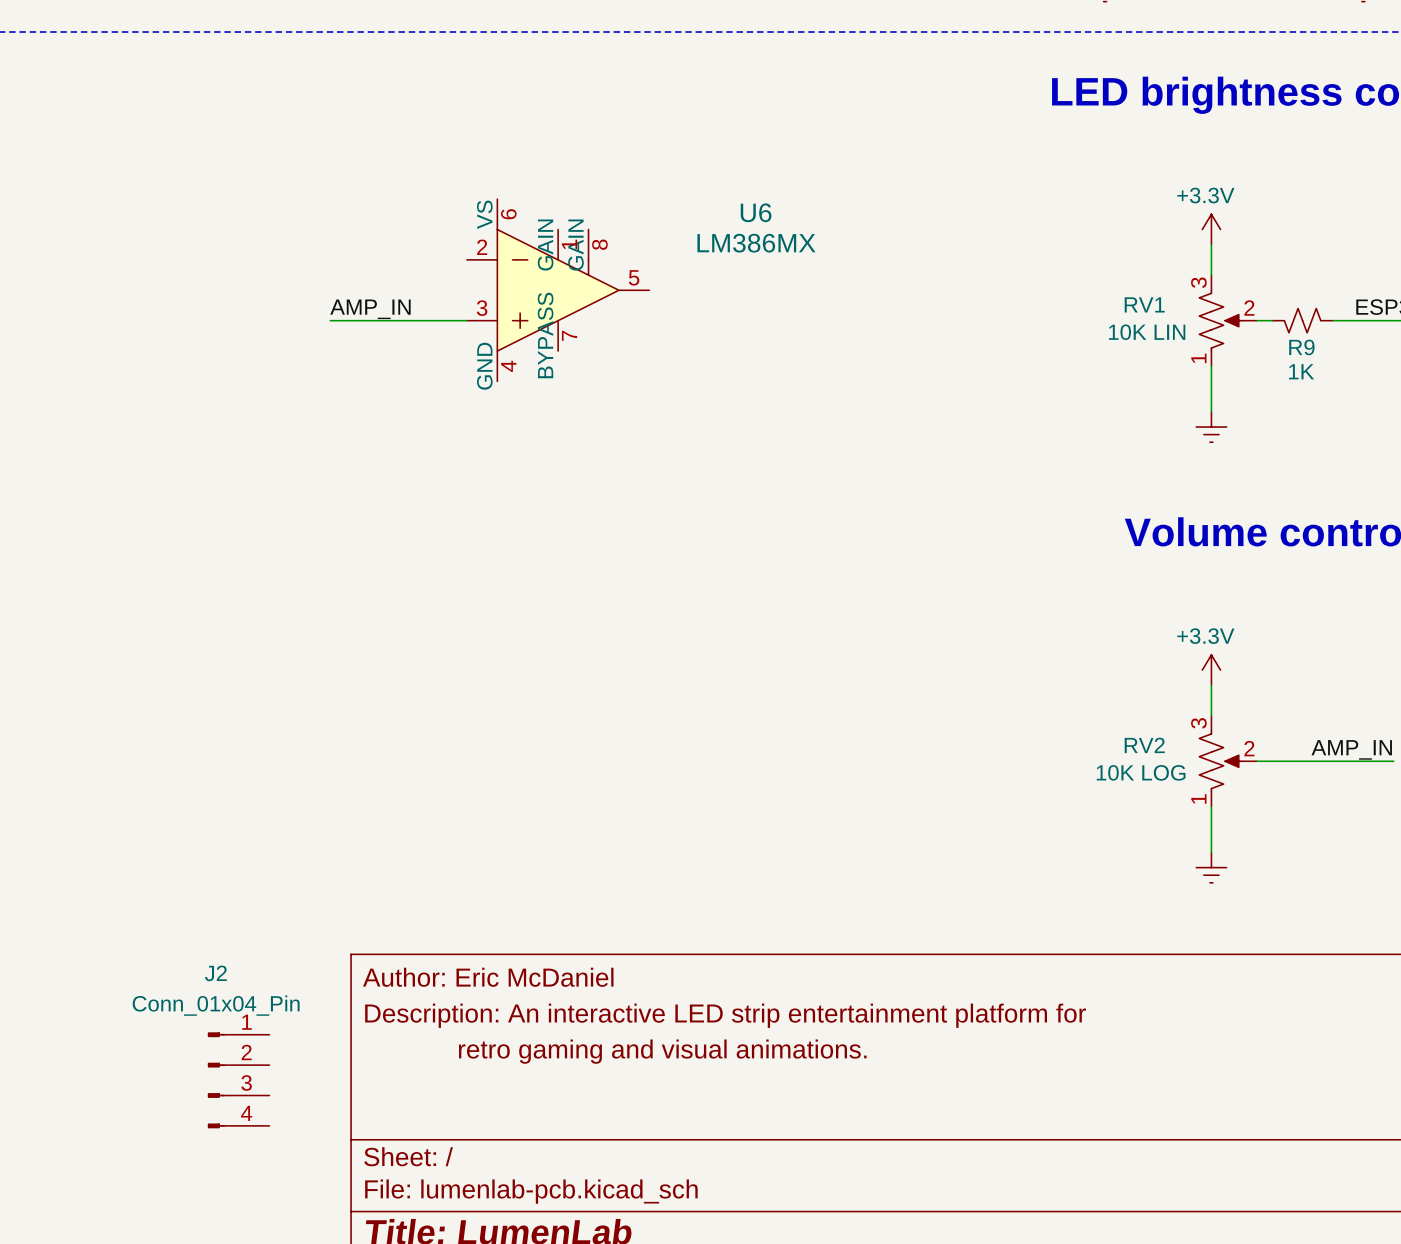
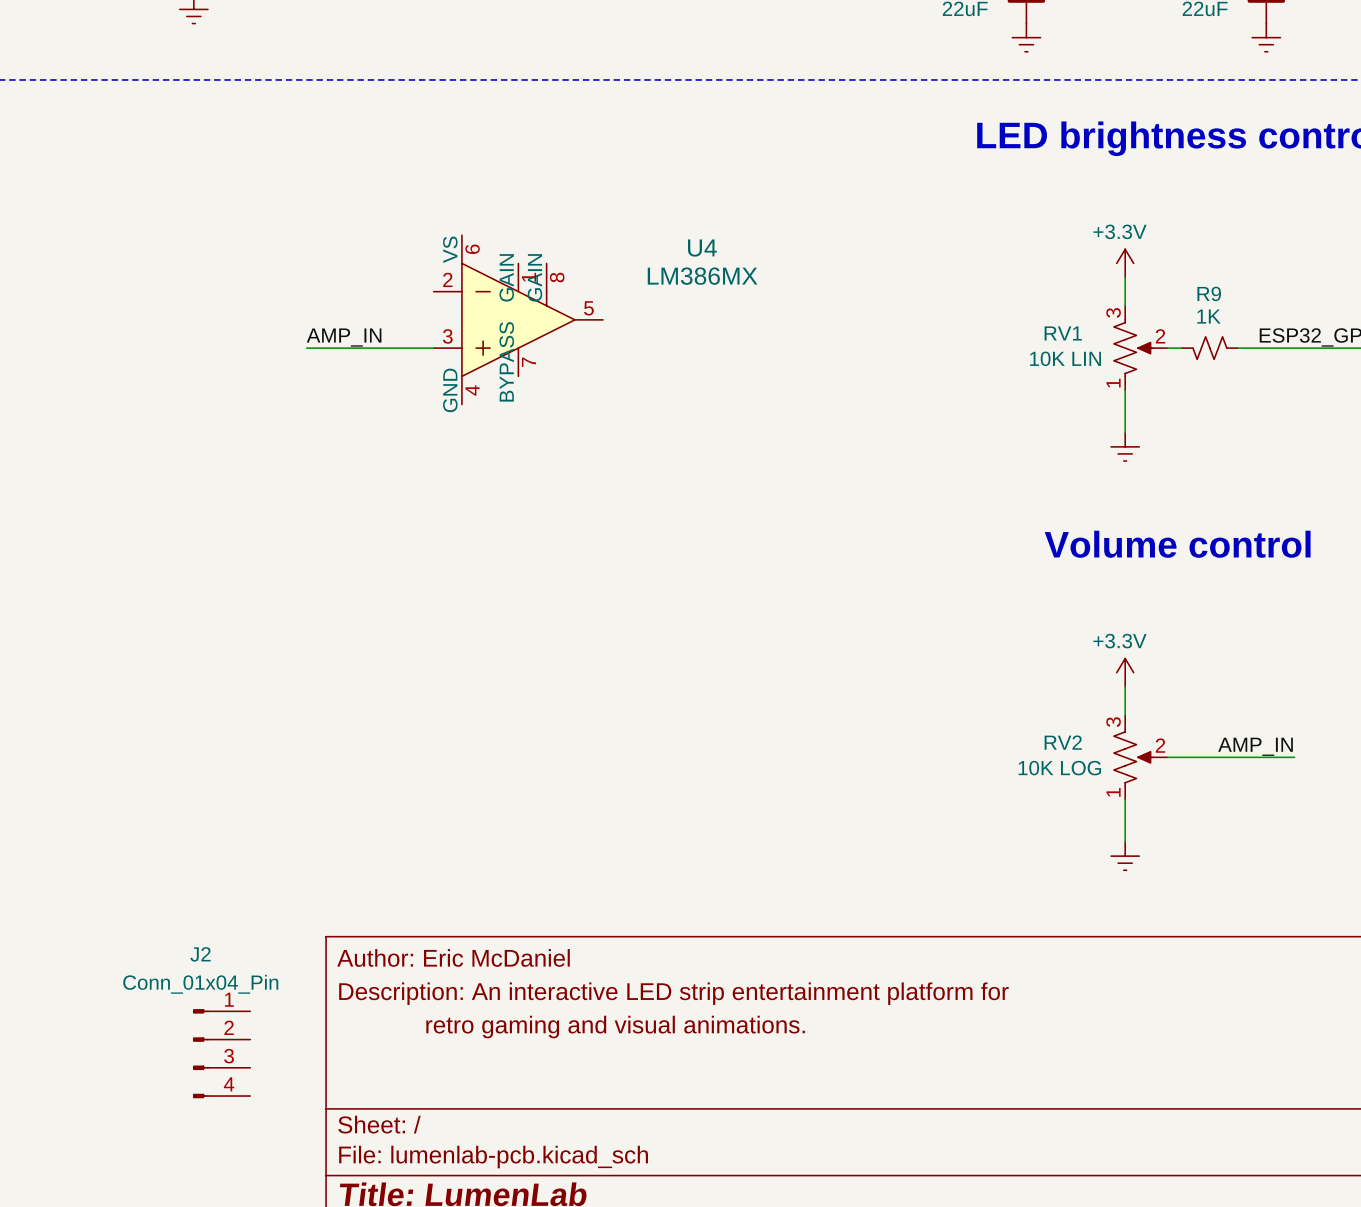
U6 name: U6 (756, 212) -> U4 (702, 248)
R9 name position: R9 (1301, 347) -> R9 (1209, 293)
R9 value position: 1K (1301, 371) -> 1K (1208, 316)

